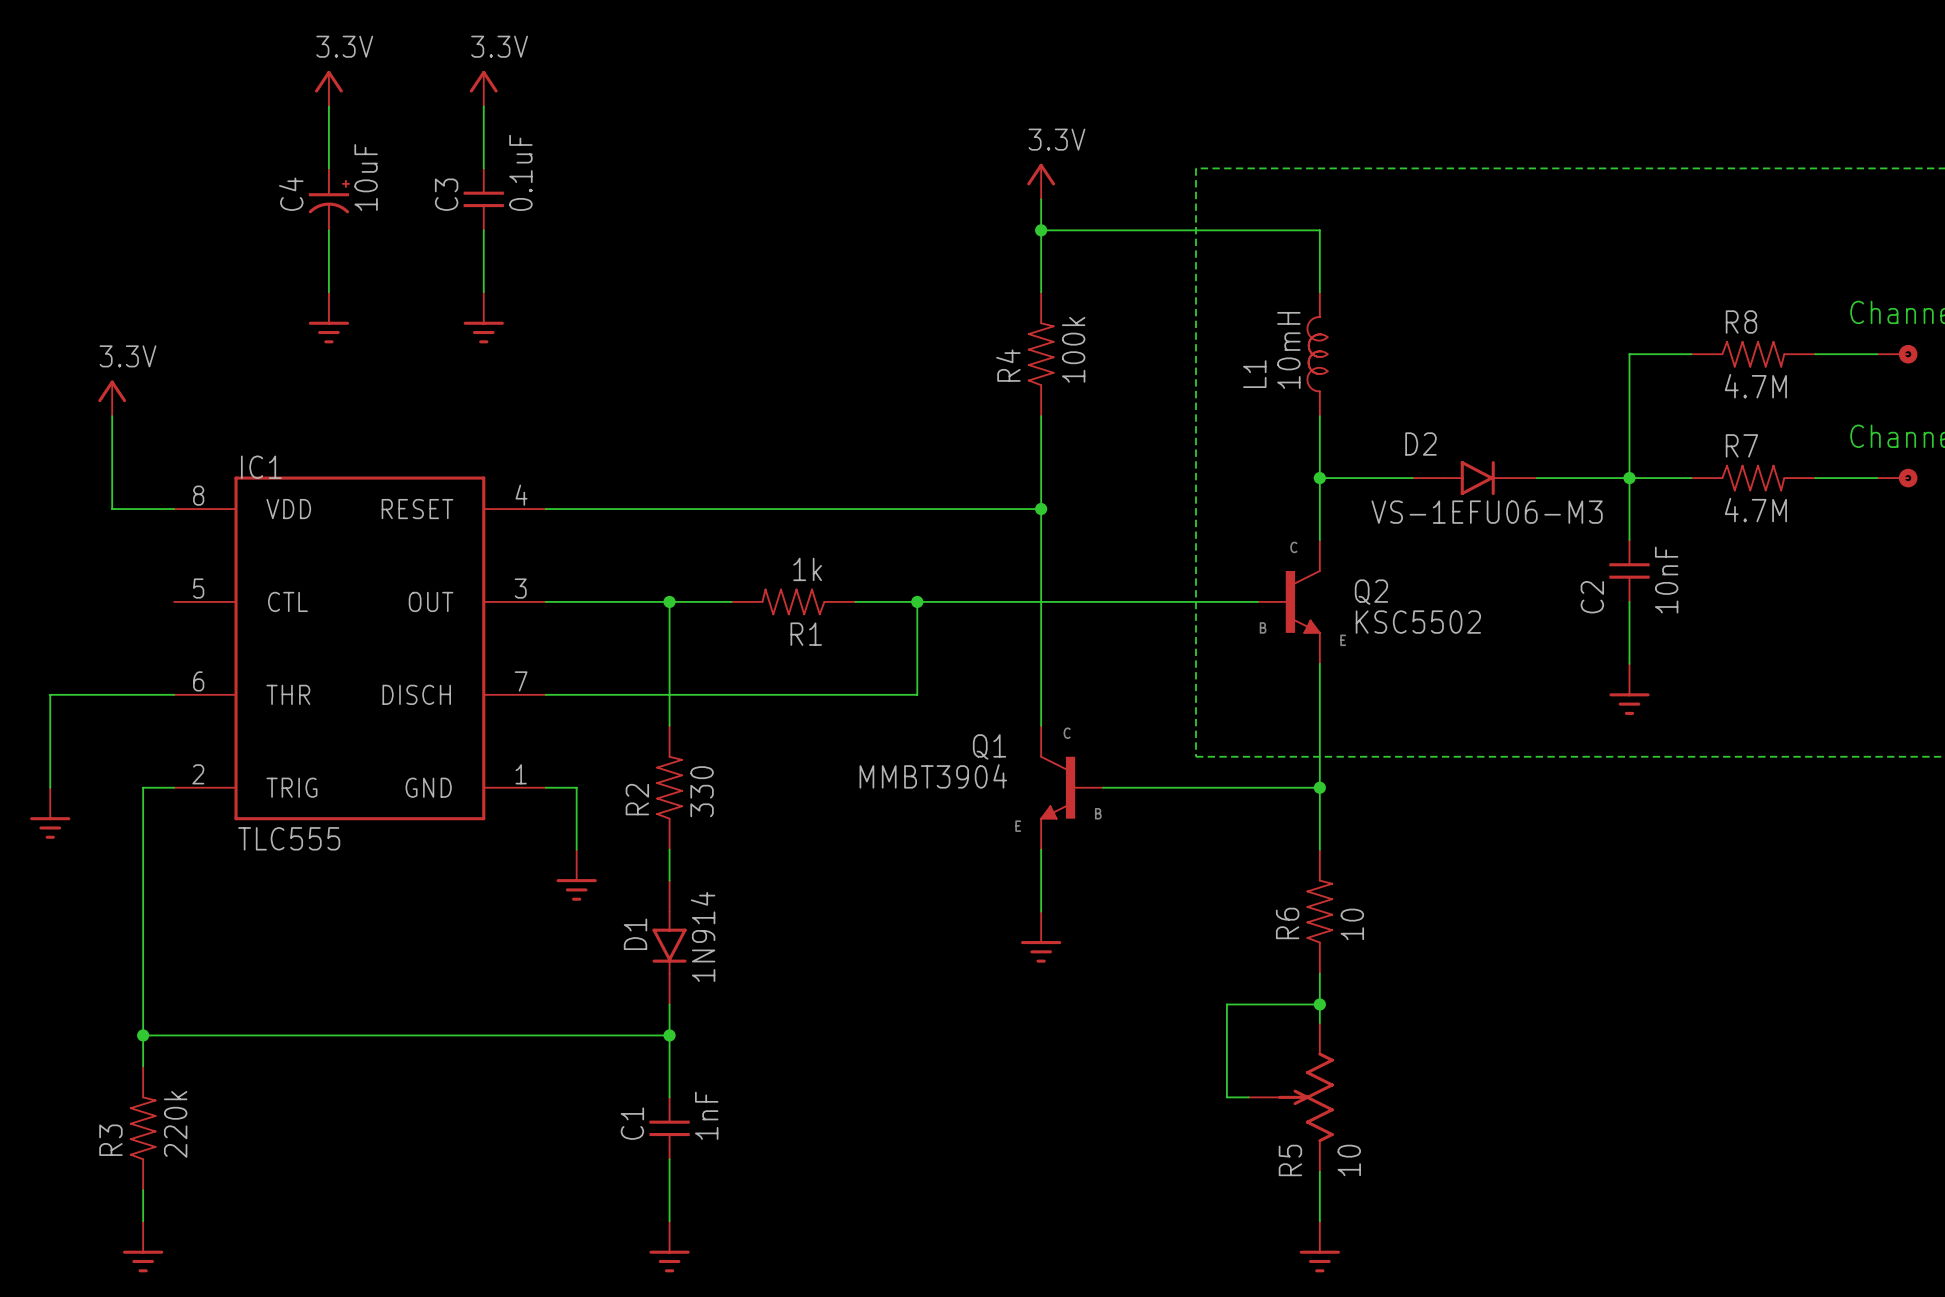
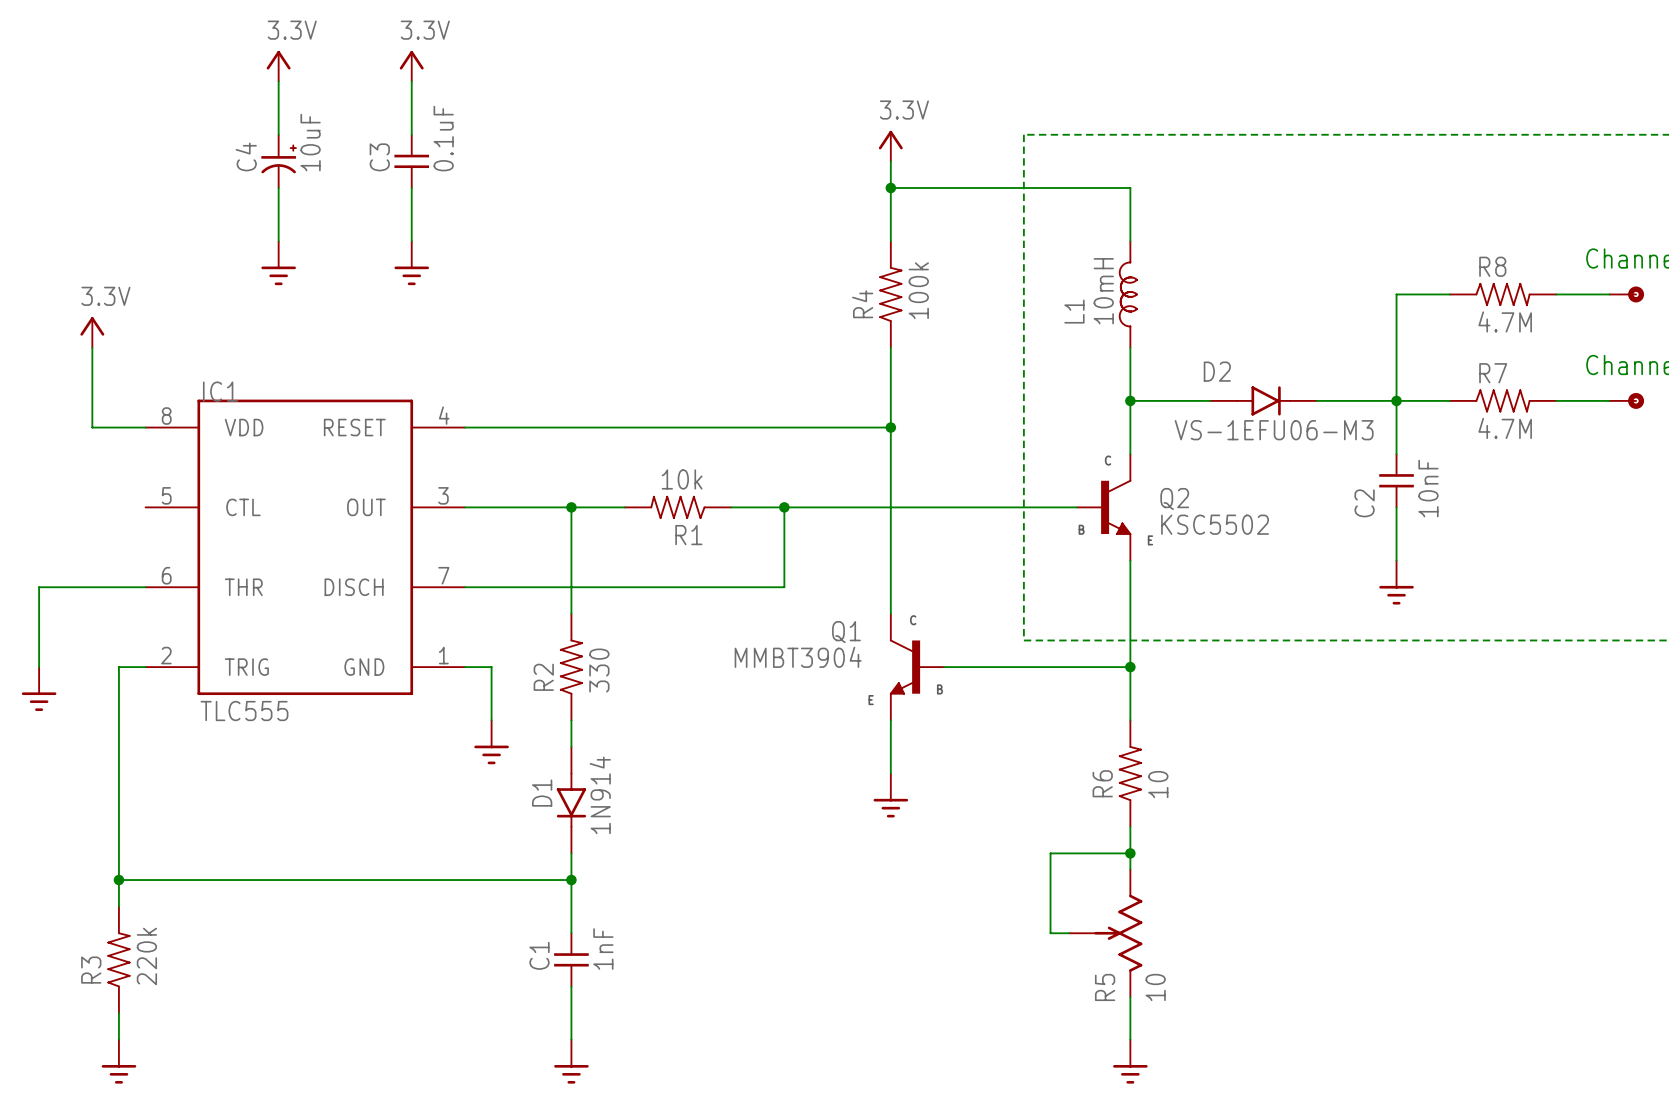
R1 value: 1k (807, 569) -> 10k (682, 479)

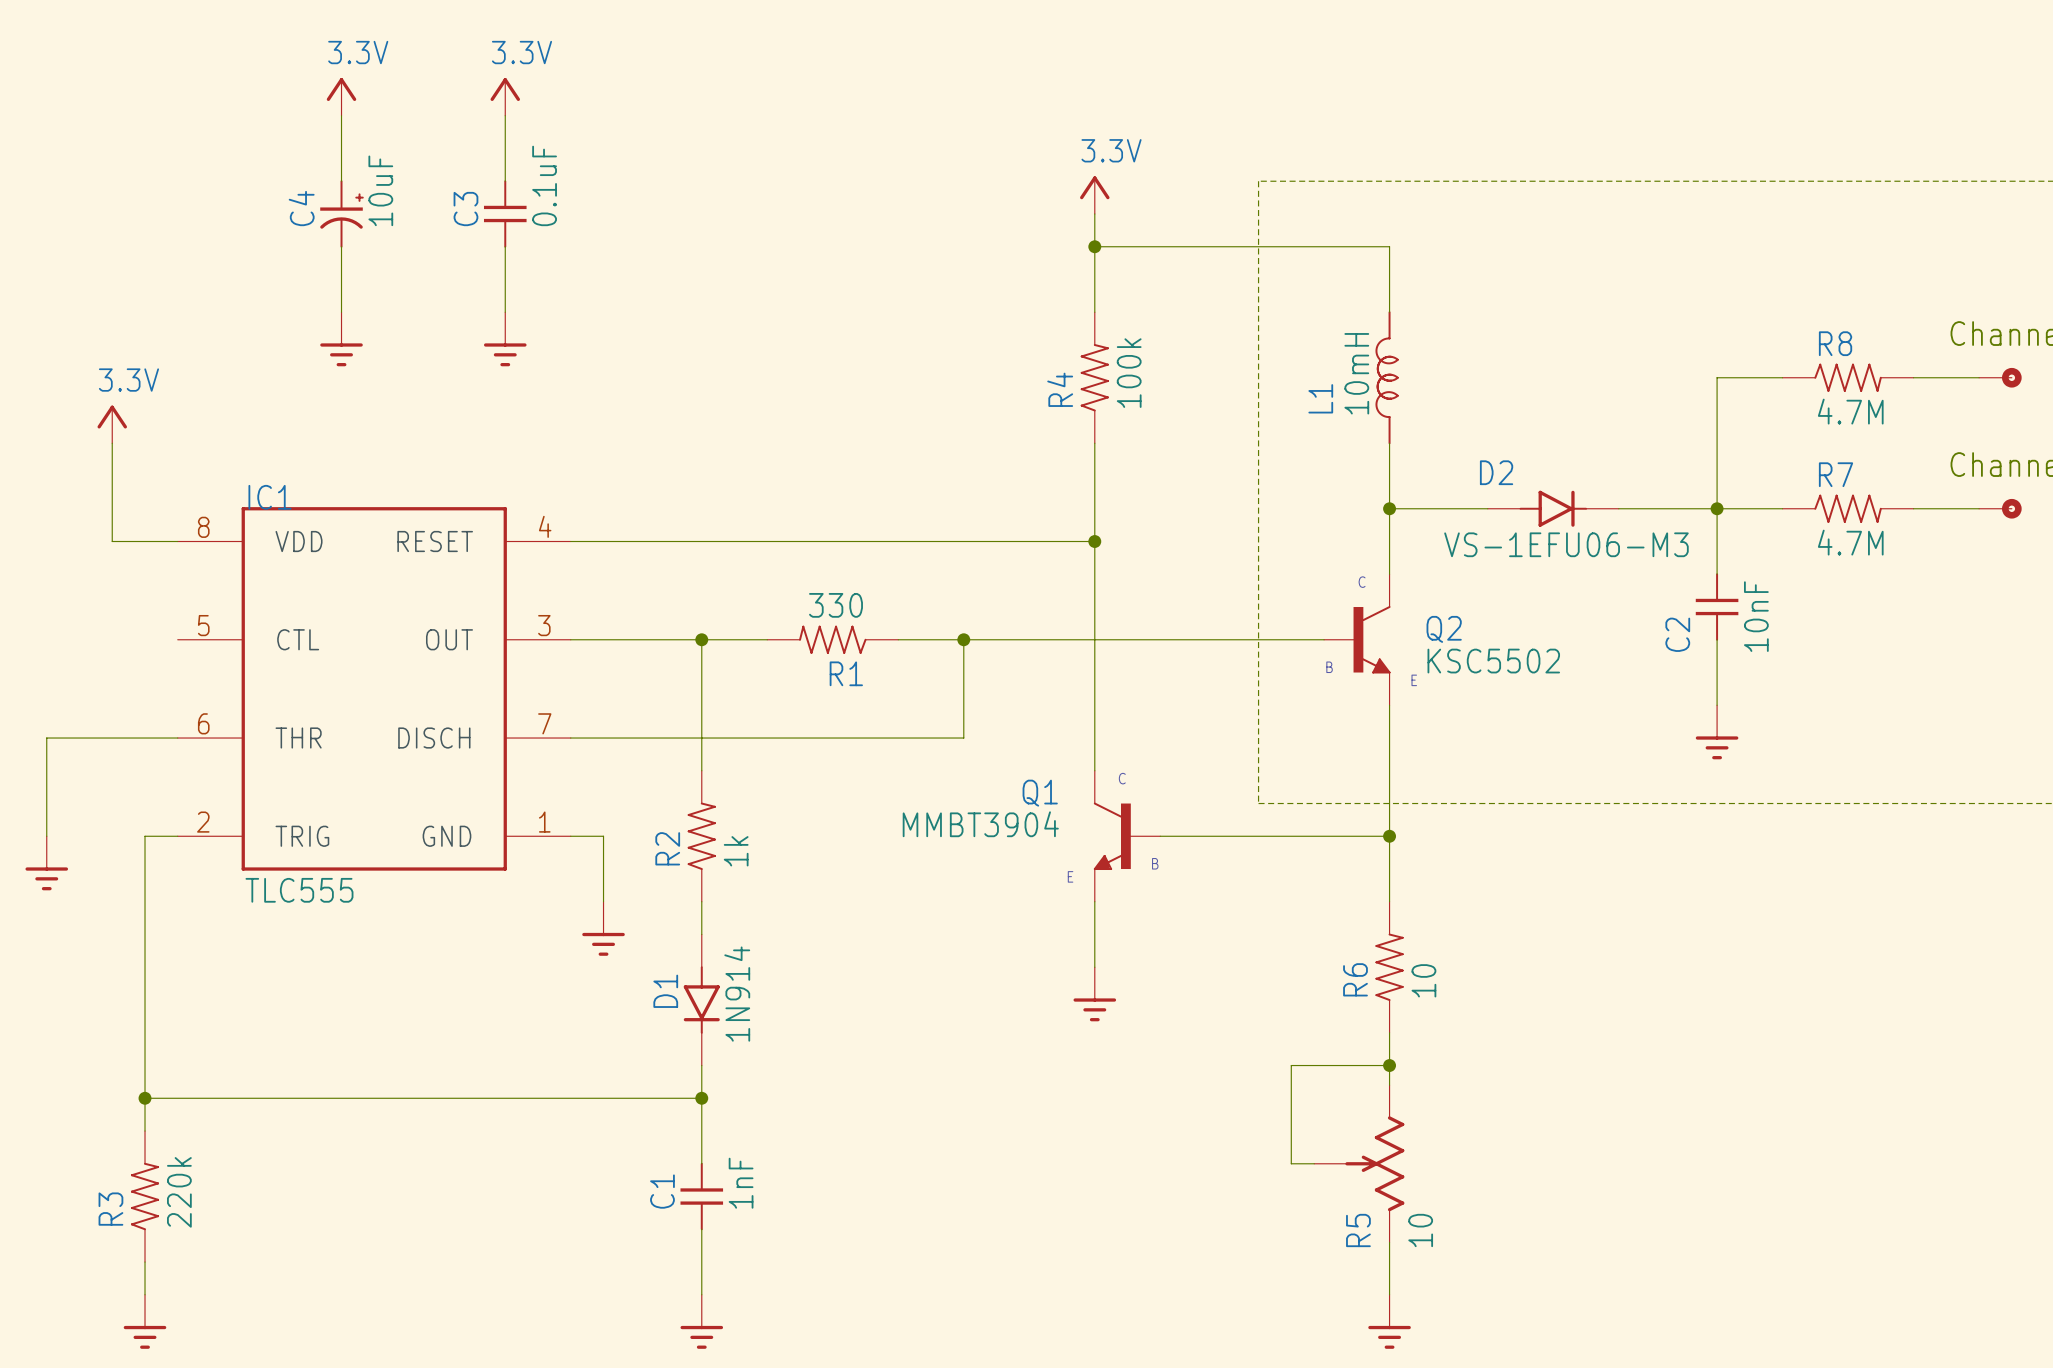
R1 value: 10k (682, 479) -> 330 (835, 605)
R2 value: 330 (599, 670) -> 1k (736, 851)

